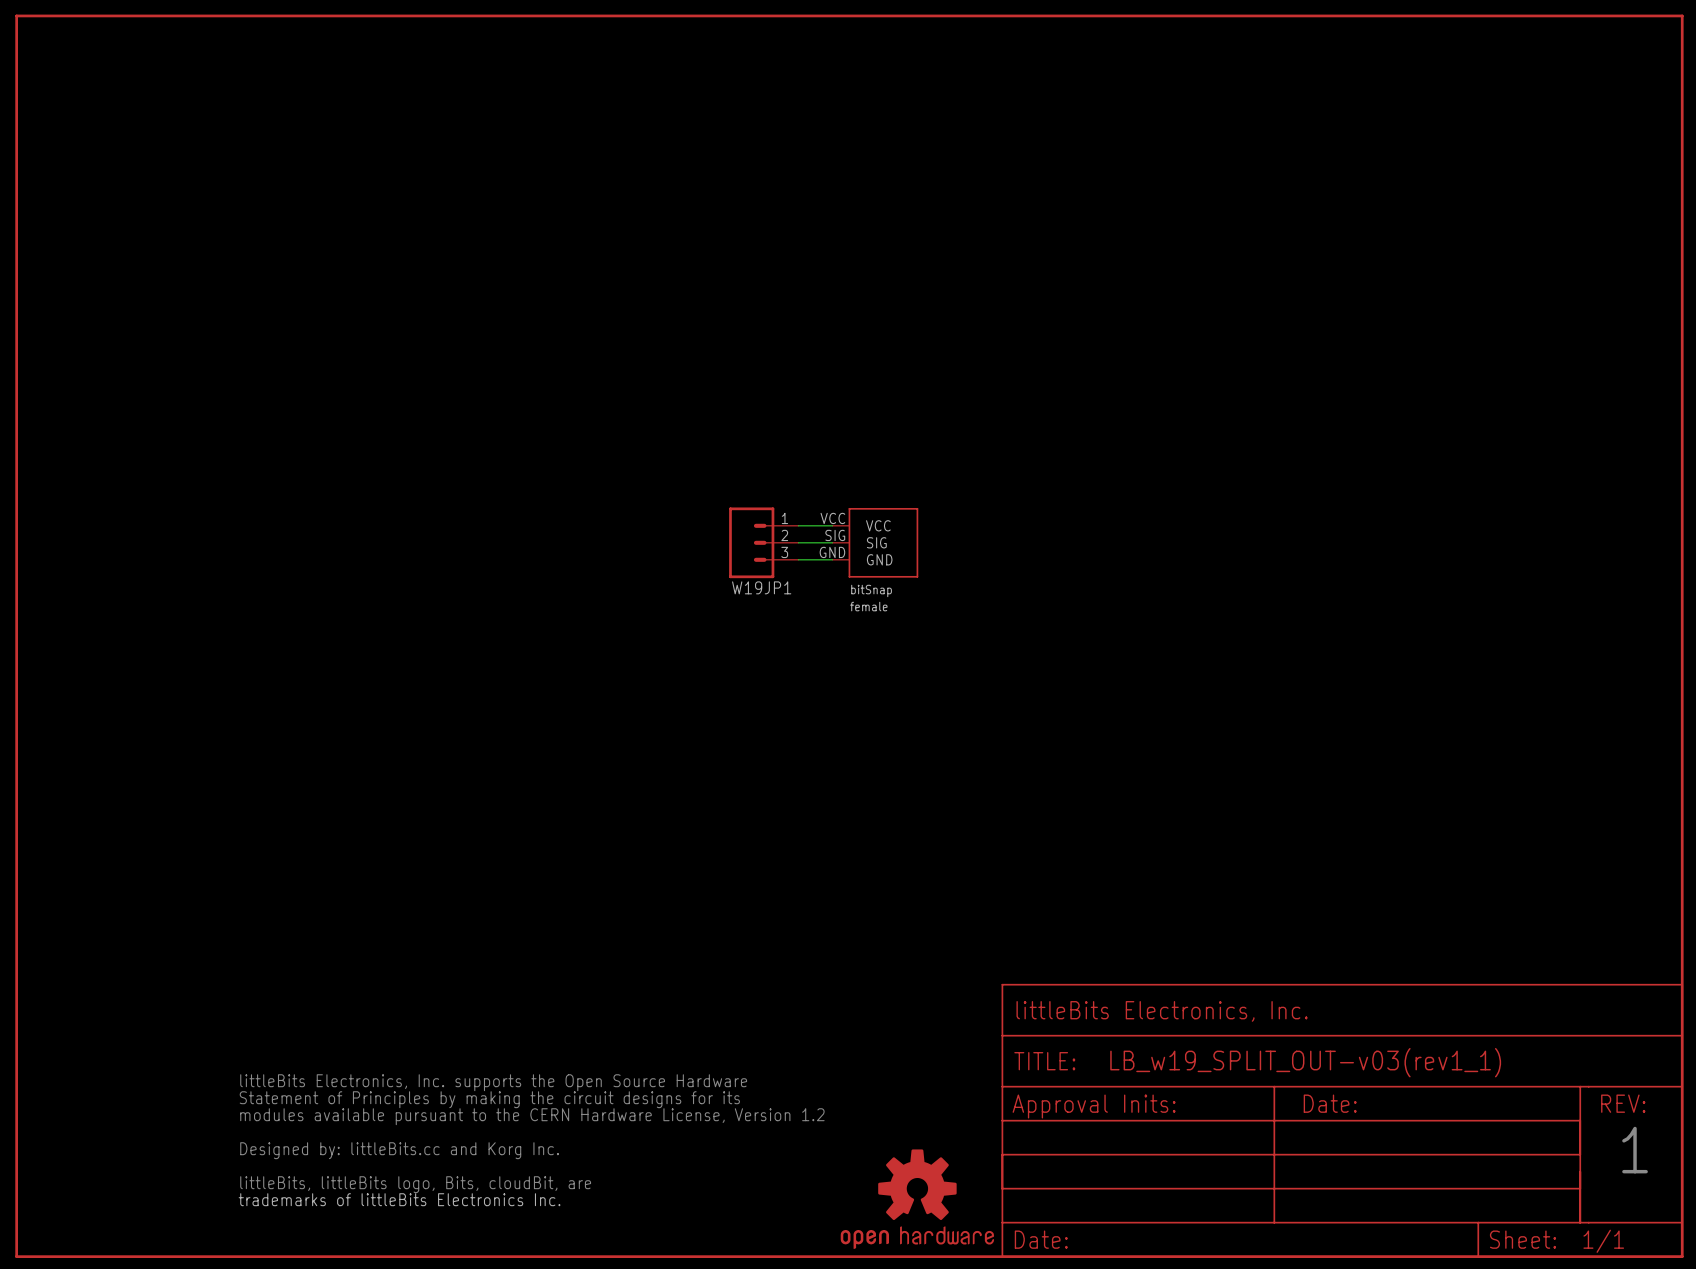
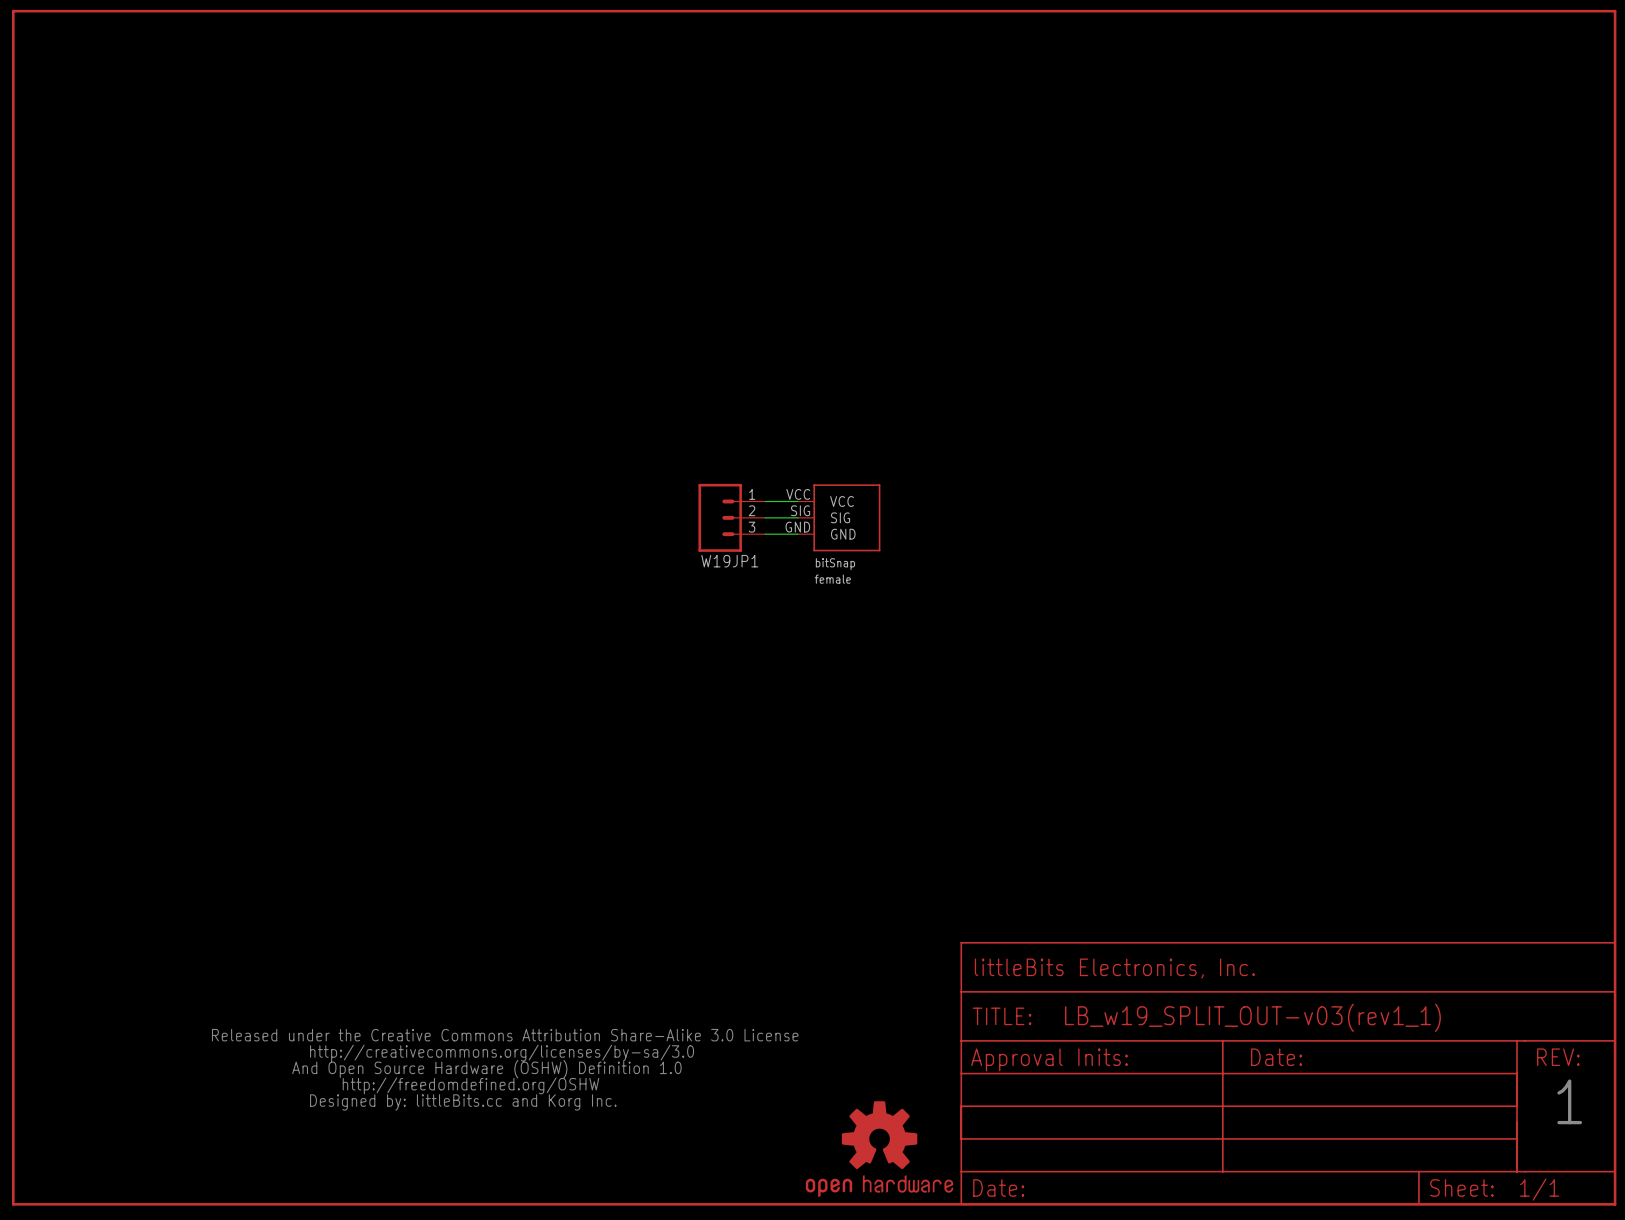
part: none -> (505, 1069)
part: (531, 1140) -> none

